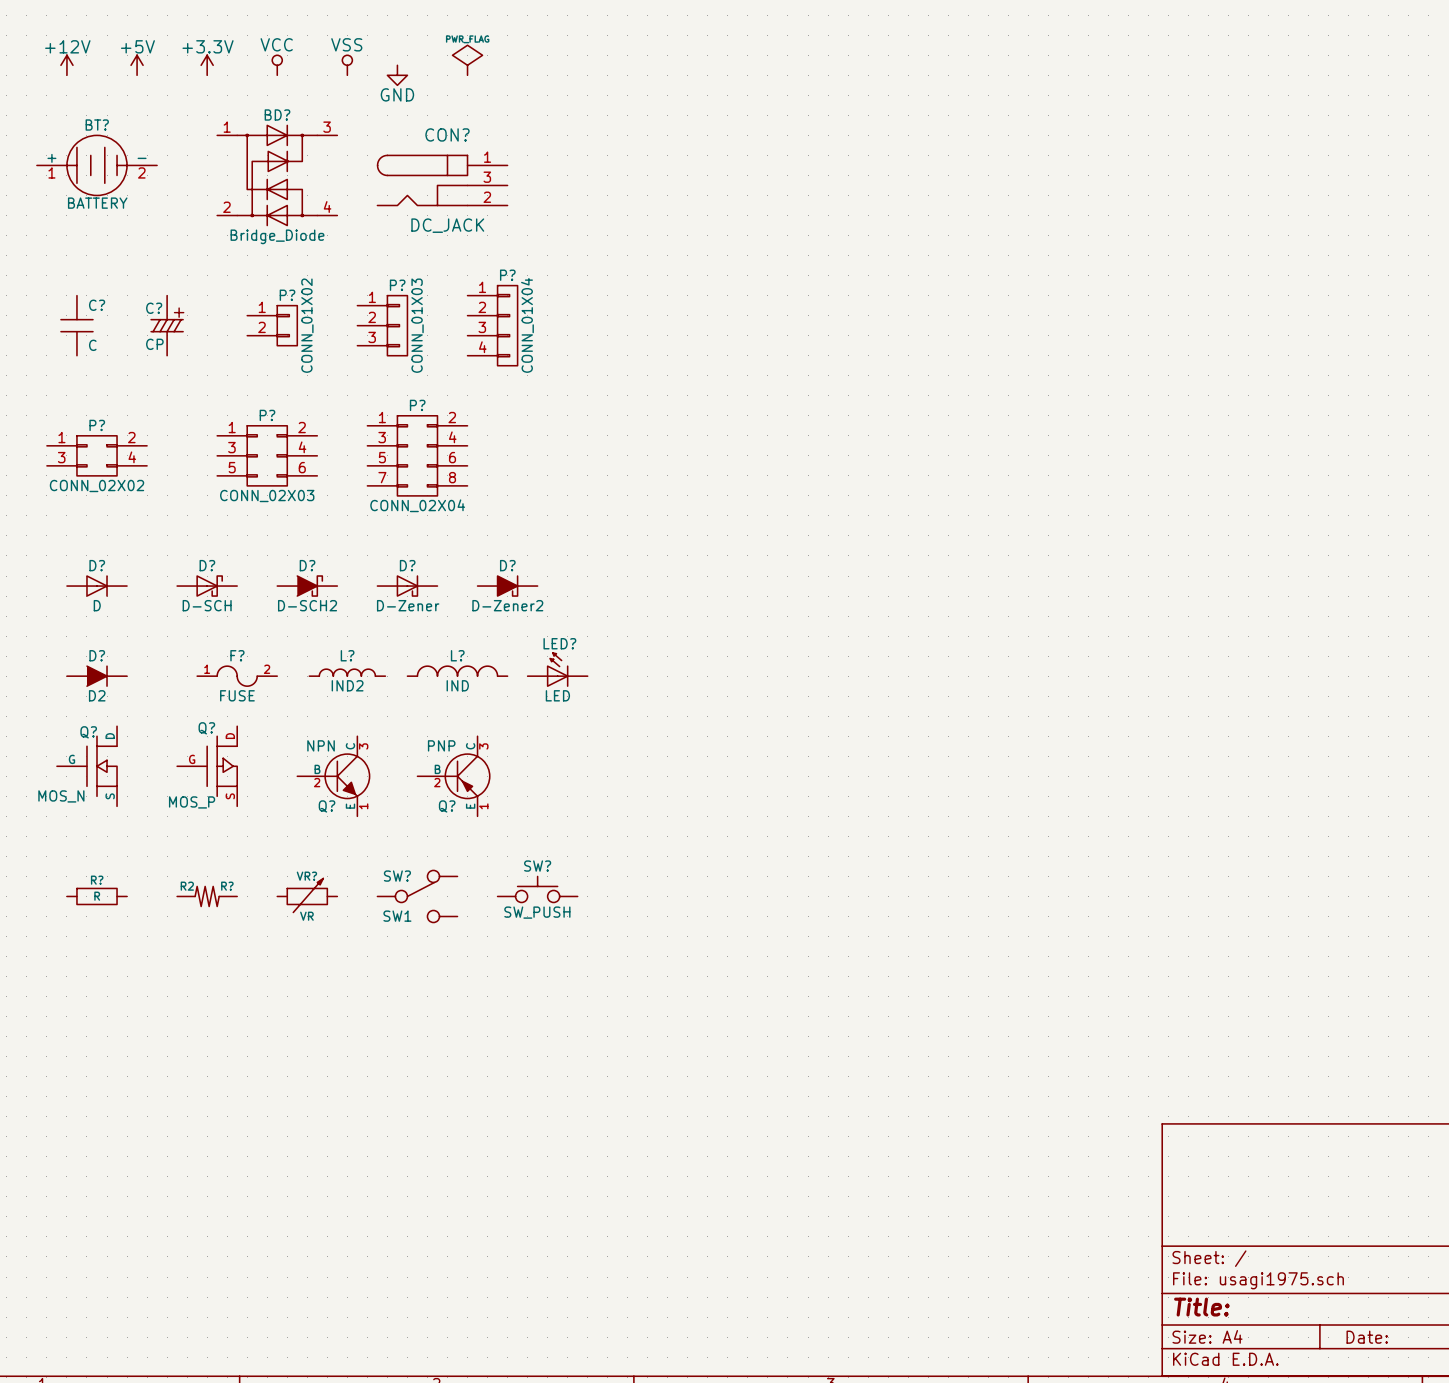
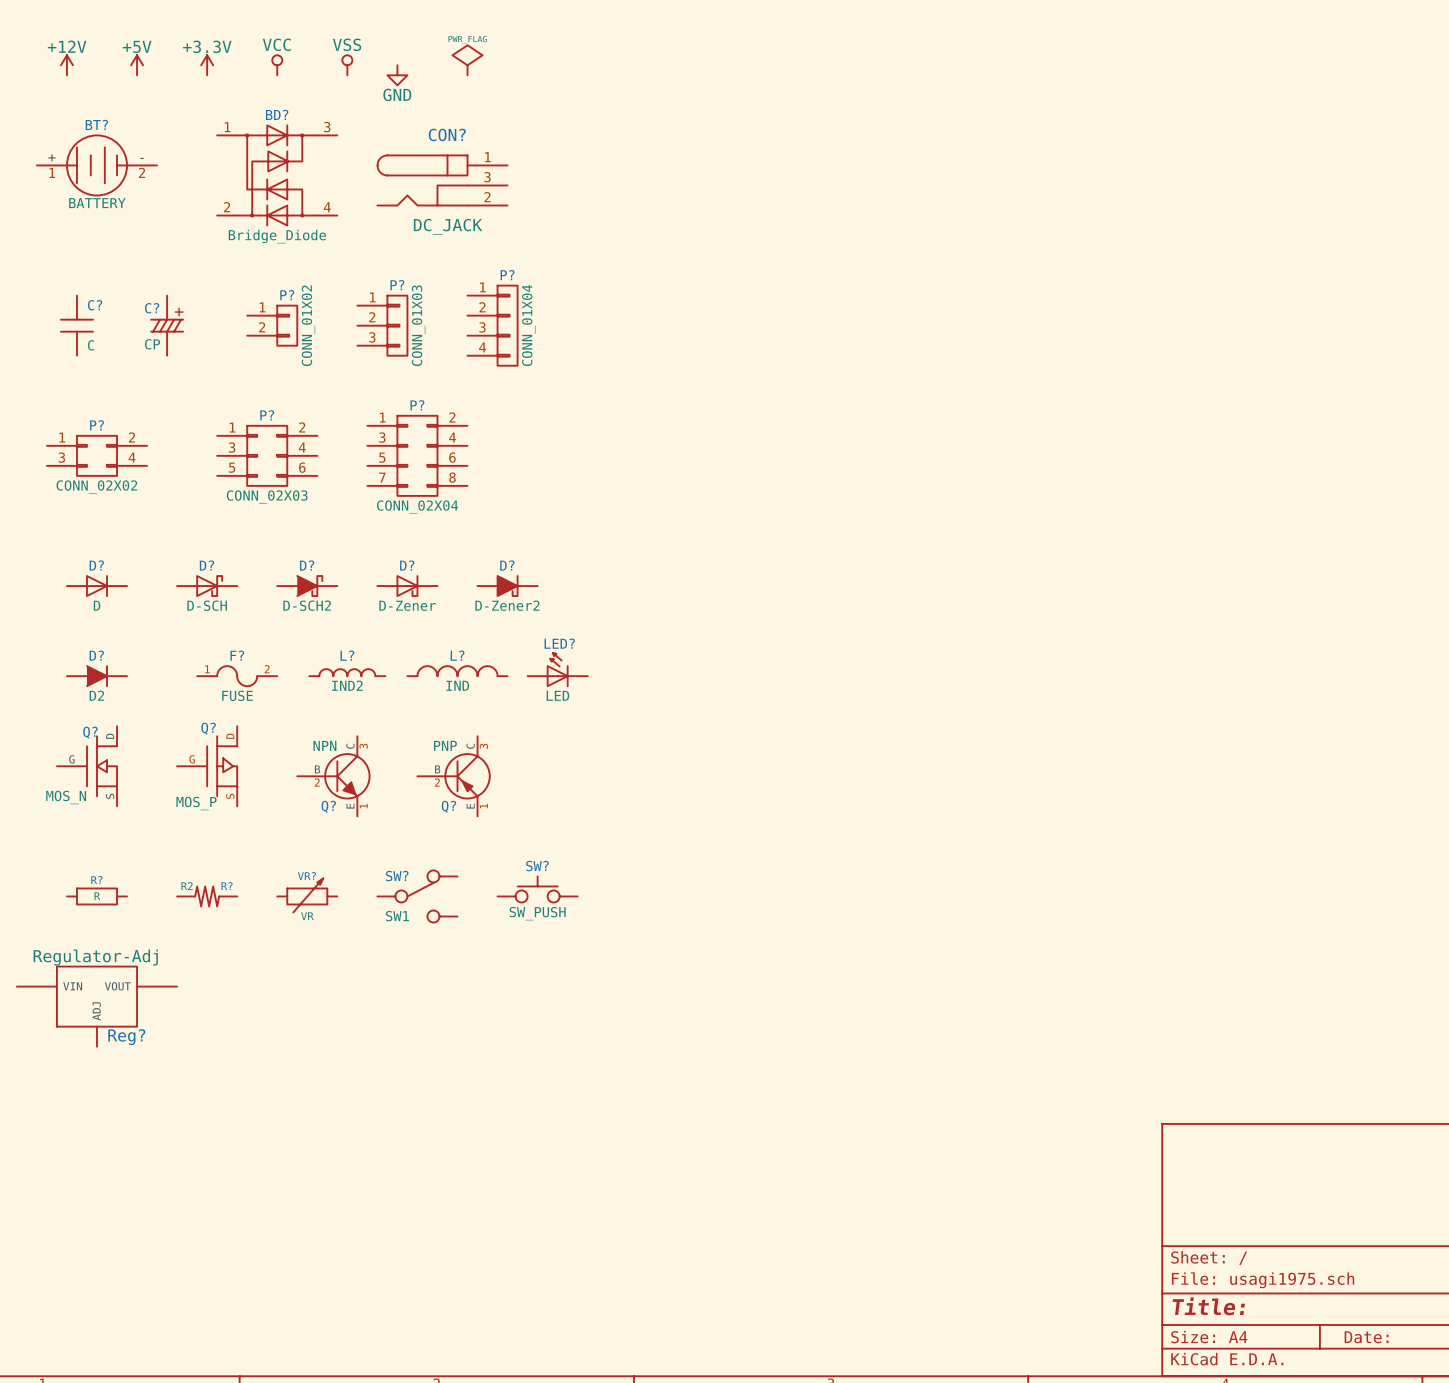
Reg?: none -> Regulator-Adj (97, 1006)

